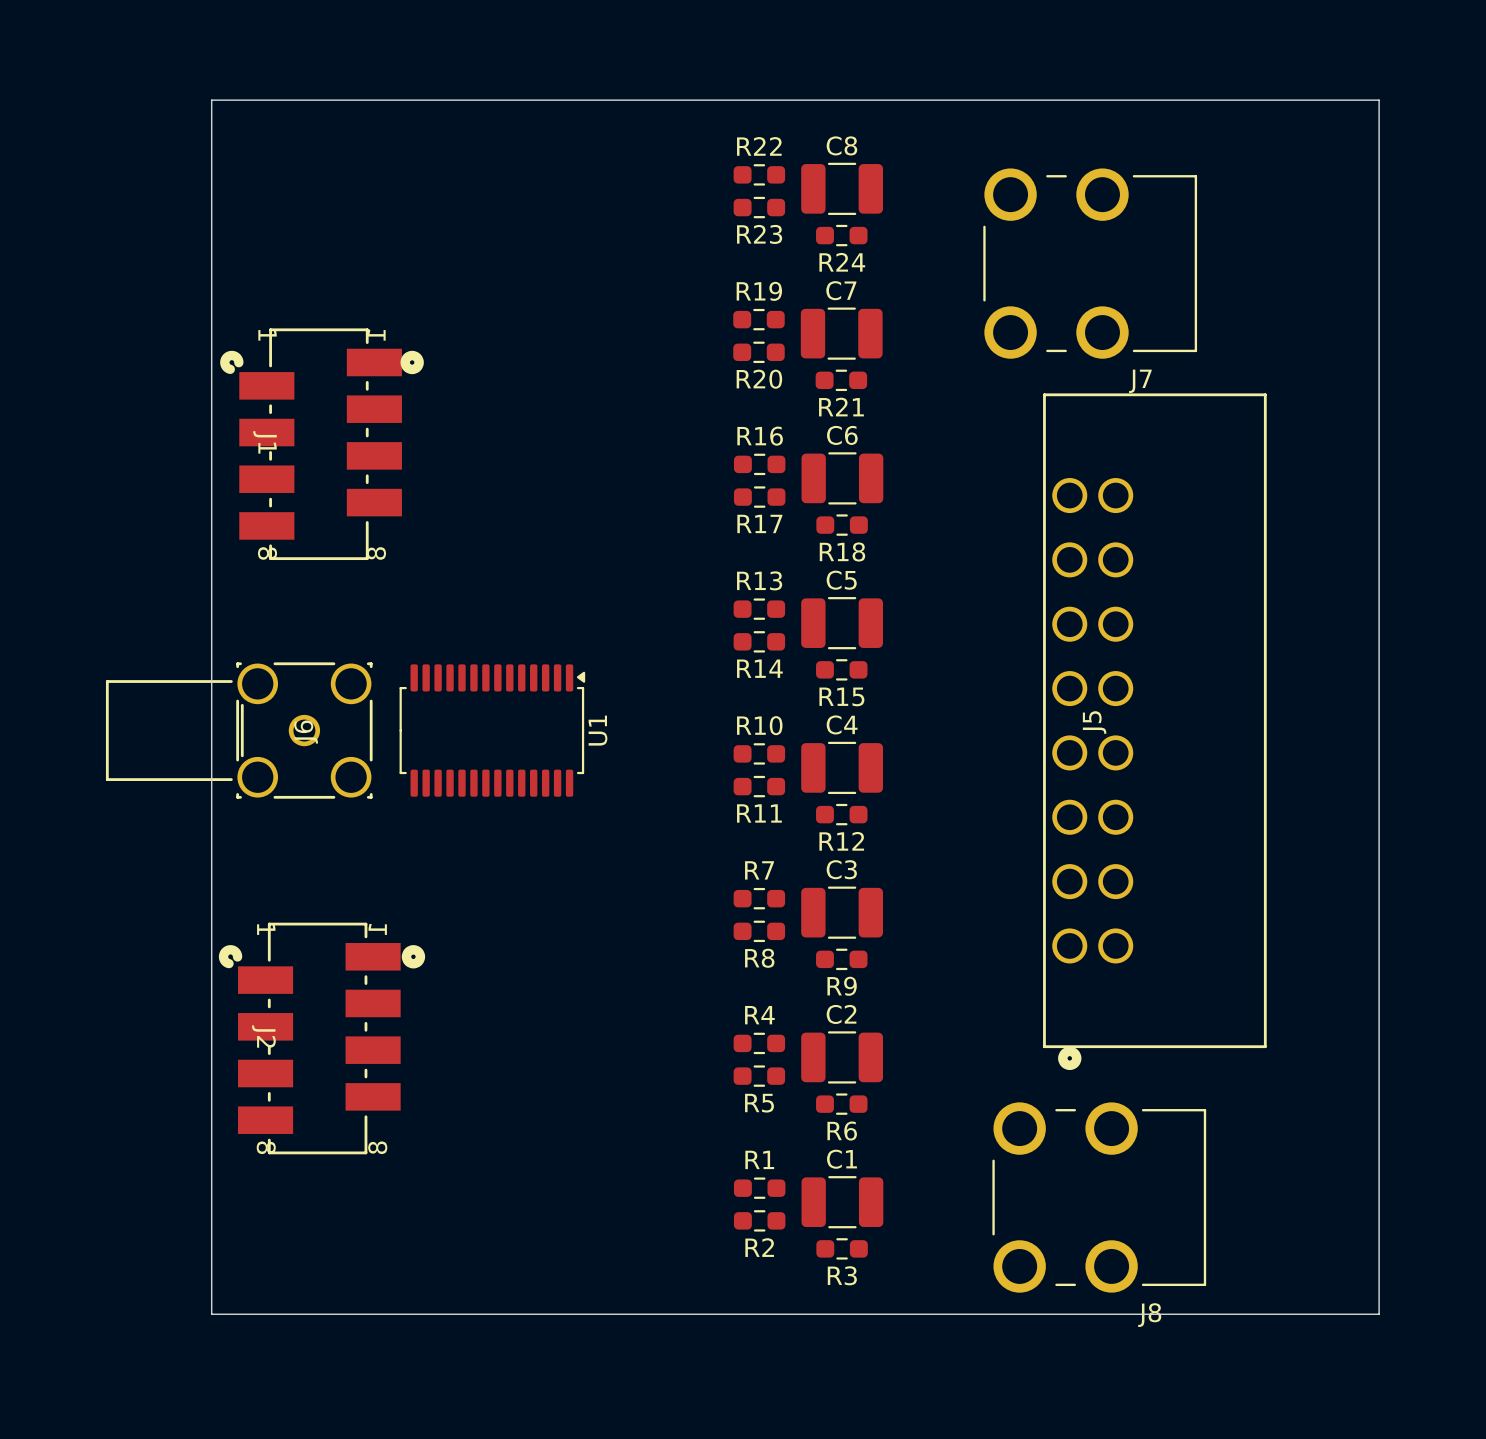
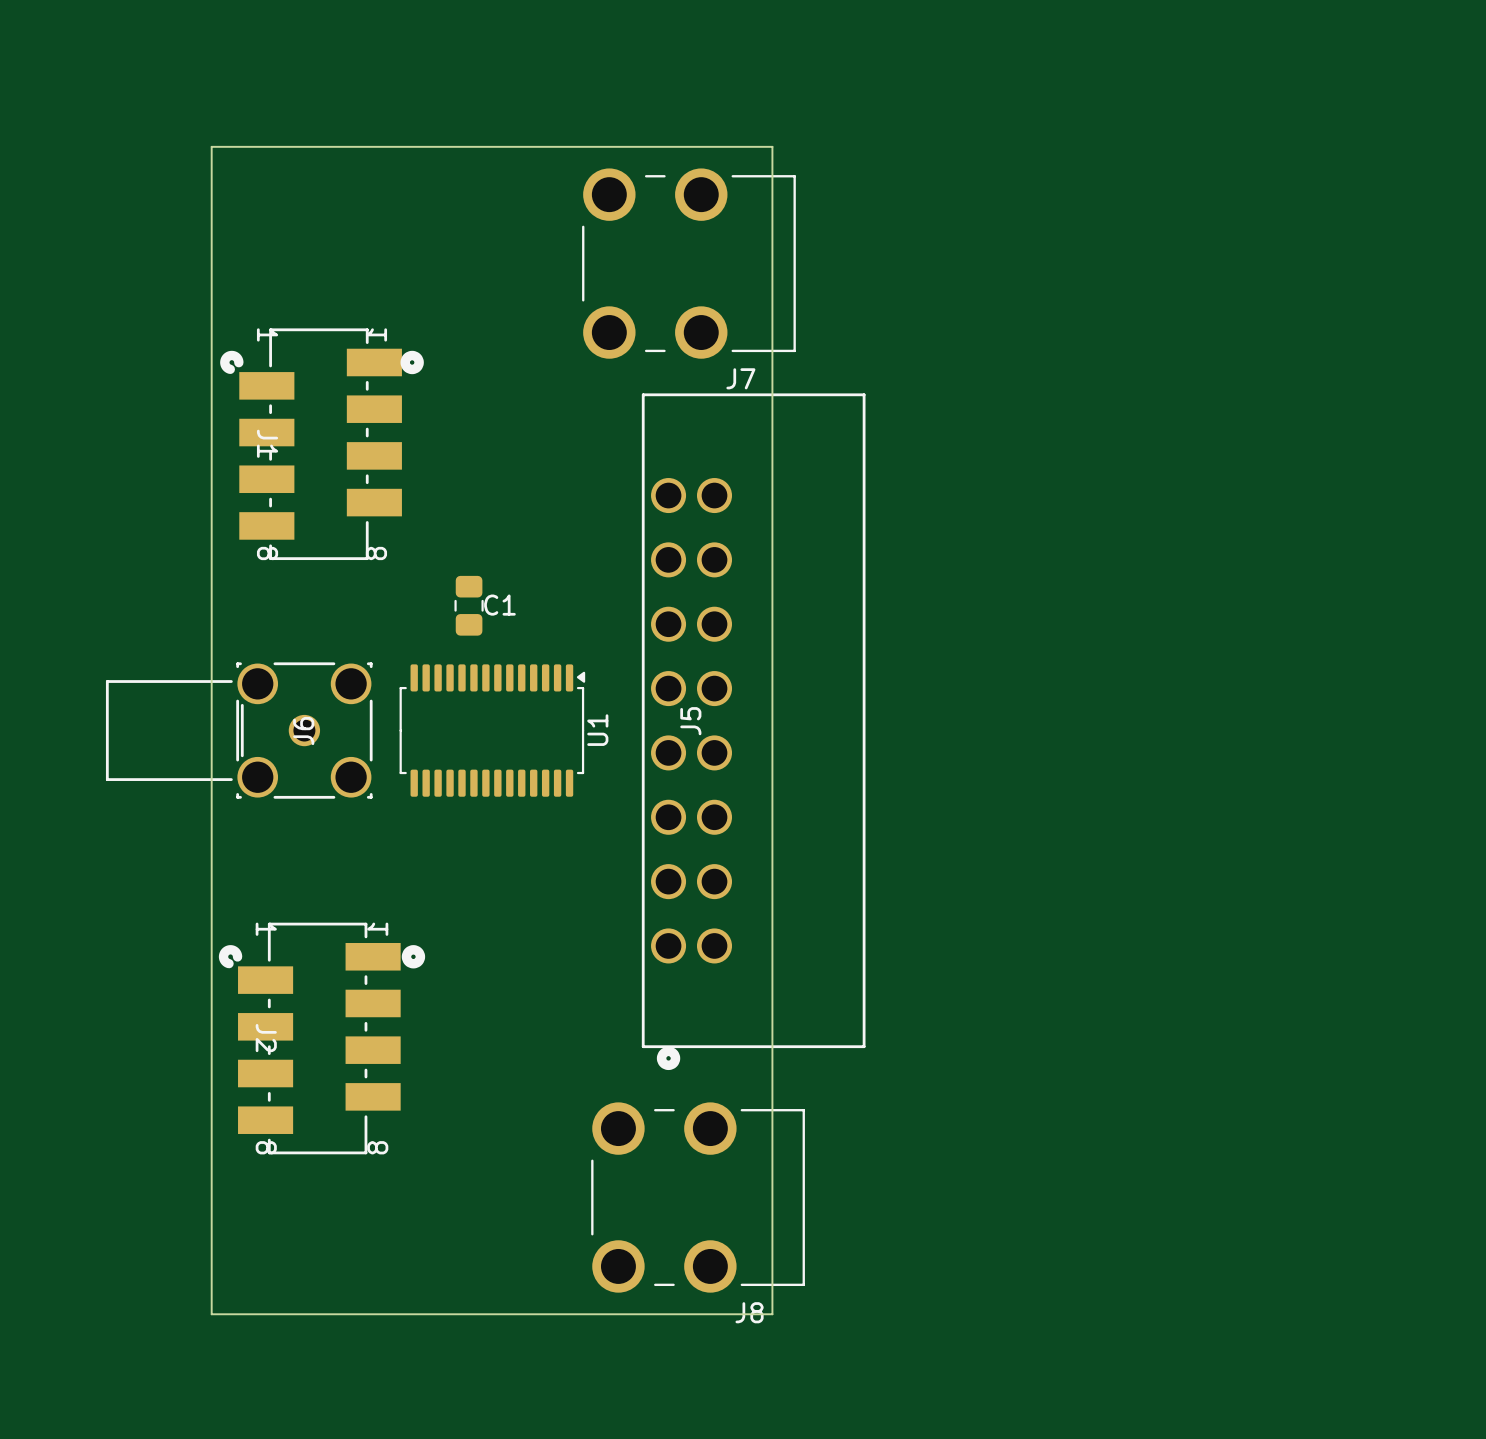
board edge: (211, 146) (211, 100) (1379, 100) (1379, 1314) (772, 1314) -> (211, 146) (772, 146) (772, 1314)
R22: (759, 174) -> none
C8: (842, 188) -> none
R23: (759, 207) -> none
R24: (841, 235) -> none
J7 position: (1090, 263) -> (688, 263)
R19: (758, 319) -> none
C7: (841, 333) -> none
R20: (758, 352) -> none
R21: (841, 380) -> none
R16: (759, 464) -> none
C6: (842, 478) -> none
R17: (759, 497) -> none
R18: (842, 525) -> none
R13: (759, 609) -> none
C5: (842, 623) -> none
R14: (759, 641) -> none
R15: (841, 669) -> none
J5 position: (1154, 731) -> (753, 731)
R10: (759, 753) -> none
C4: (842, 767) -> none
R11: (759, 786) -> none
R12: (841, 814) -> none
R7: (759, 898) -> none
C3: (842, 912) -> none
R8: (759, 931) -> none
R9: (841, 959) -> none
R4: (759, 1043) -> none
C2: (842, 1057) -> none
R5: (759, 1076) -> none
R6: (841, 1104) -> none
C1 name position: C1 (841, 1159) -> C1 (499, 605)
C1 footprint: [801, 1176, 884, 1229] -> [454, 575, 484, 636]
R1: (759, 1188) -> none
J8 position: (1099, 1197) -> (698, 1197)
R2: (759, 1220) -> none
R3: (842, 1248) -> none

